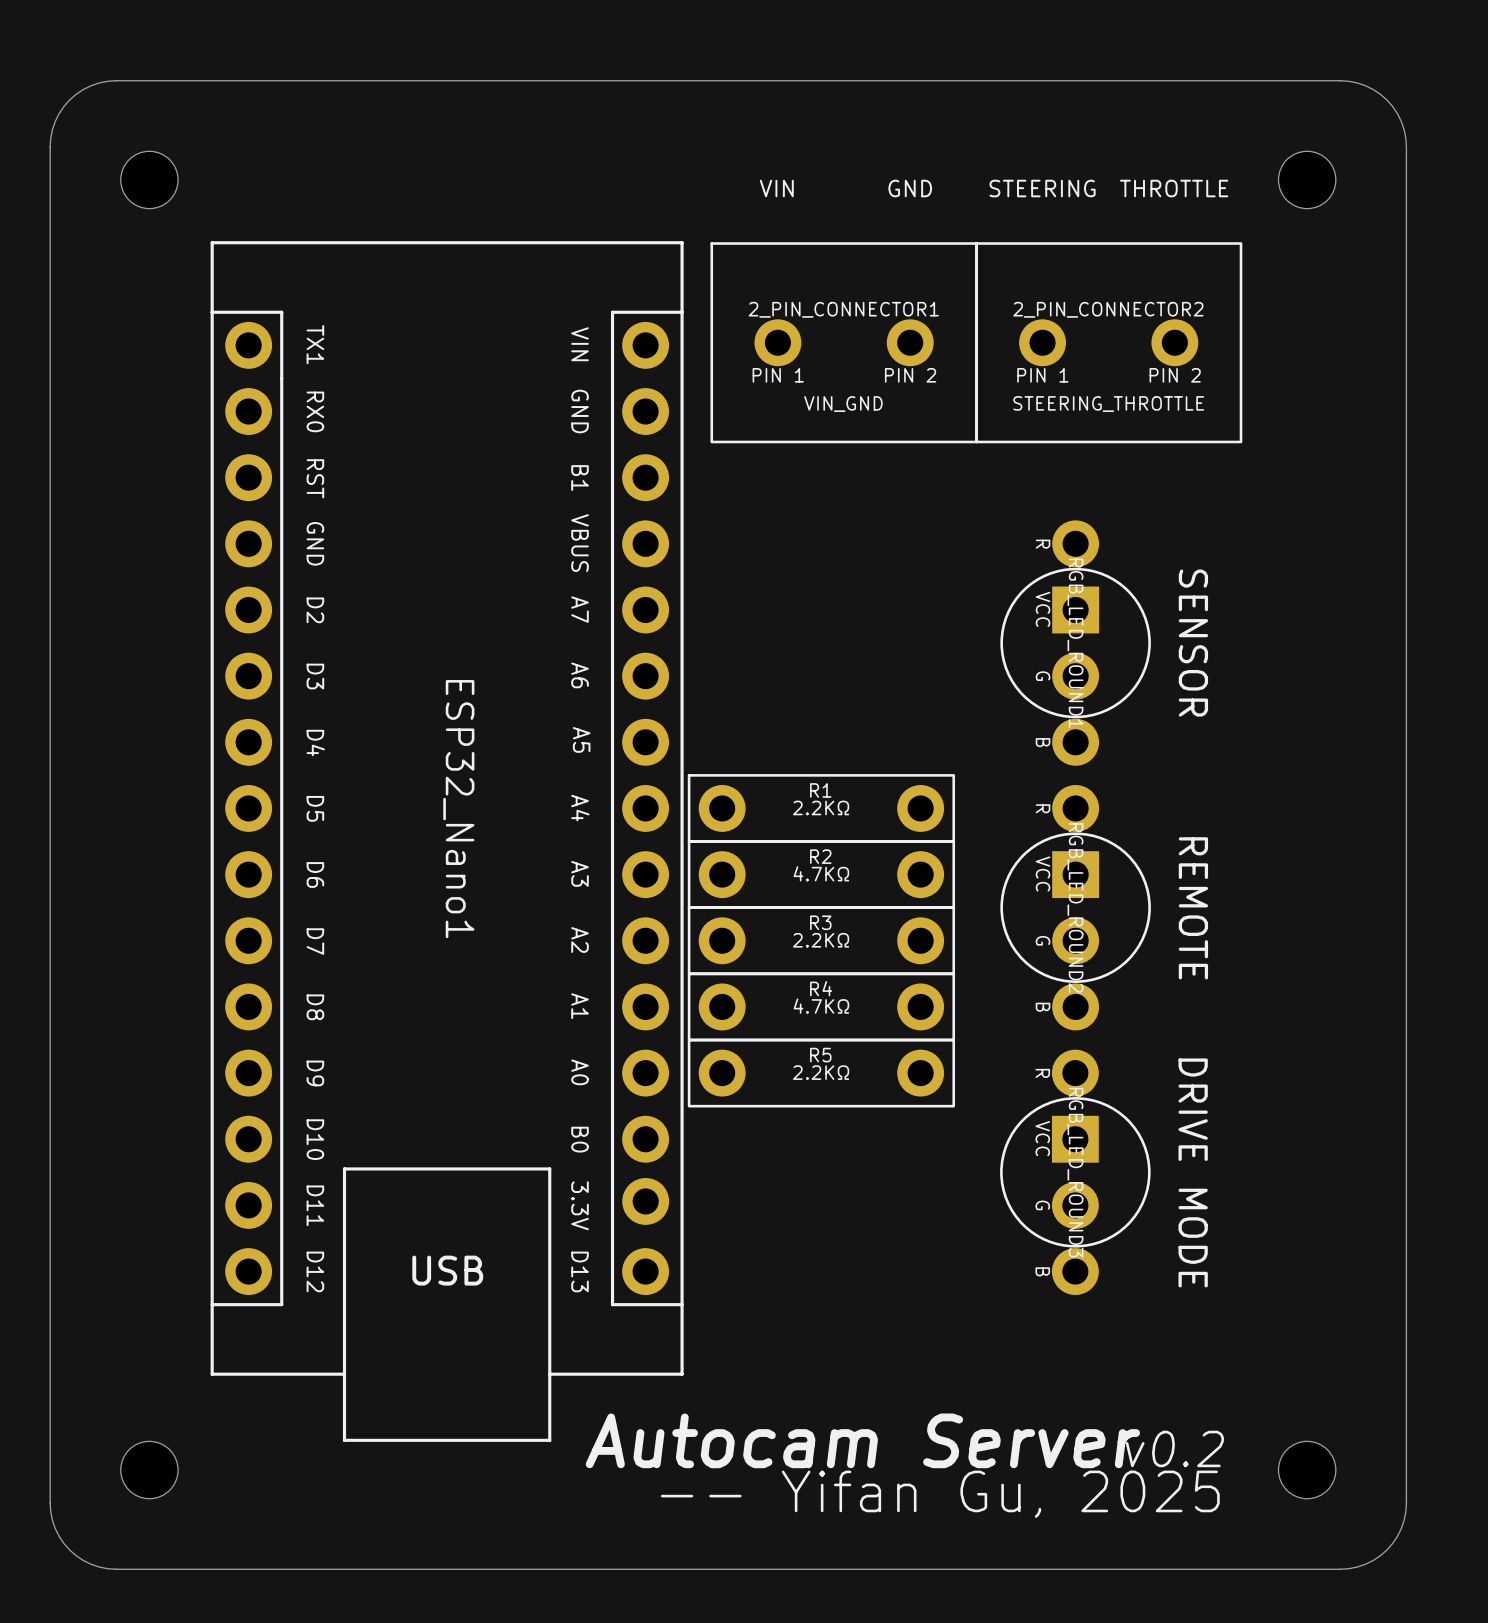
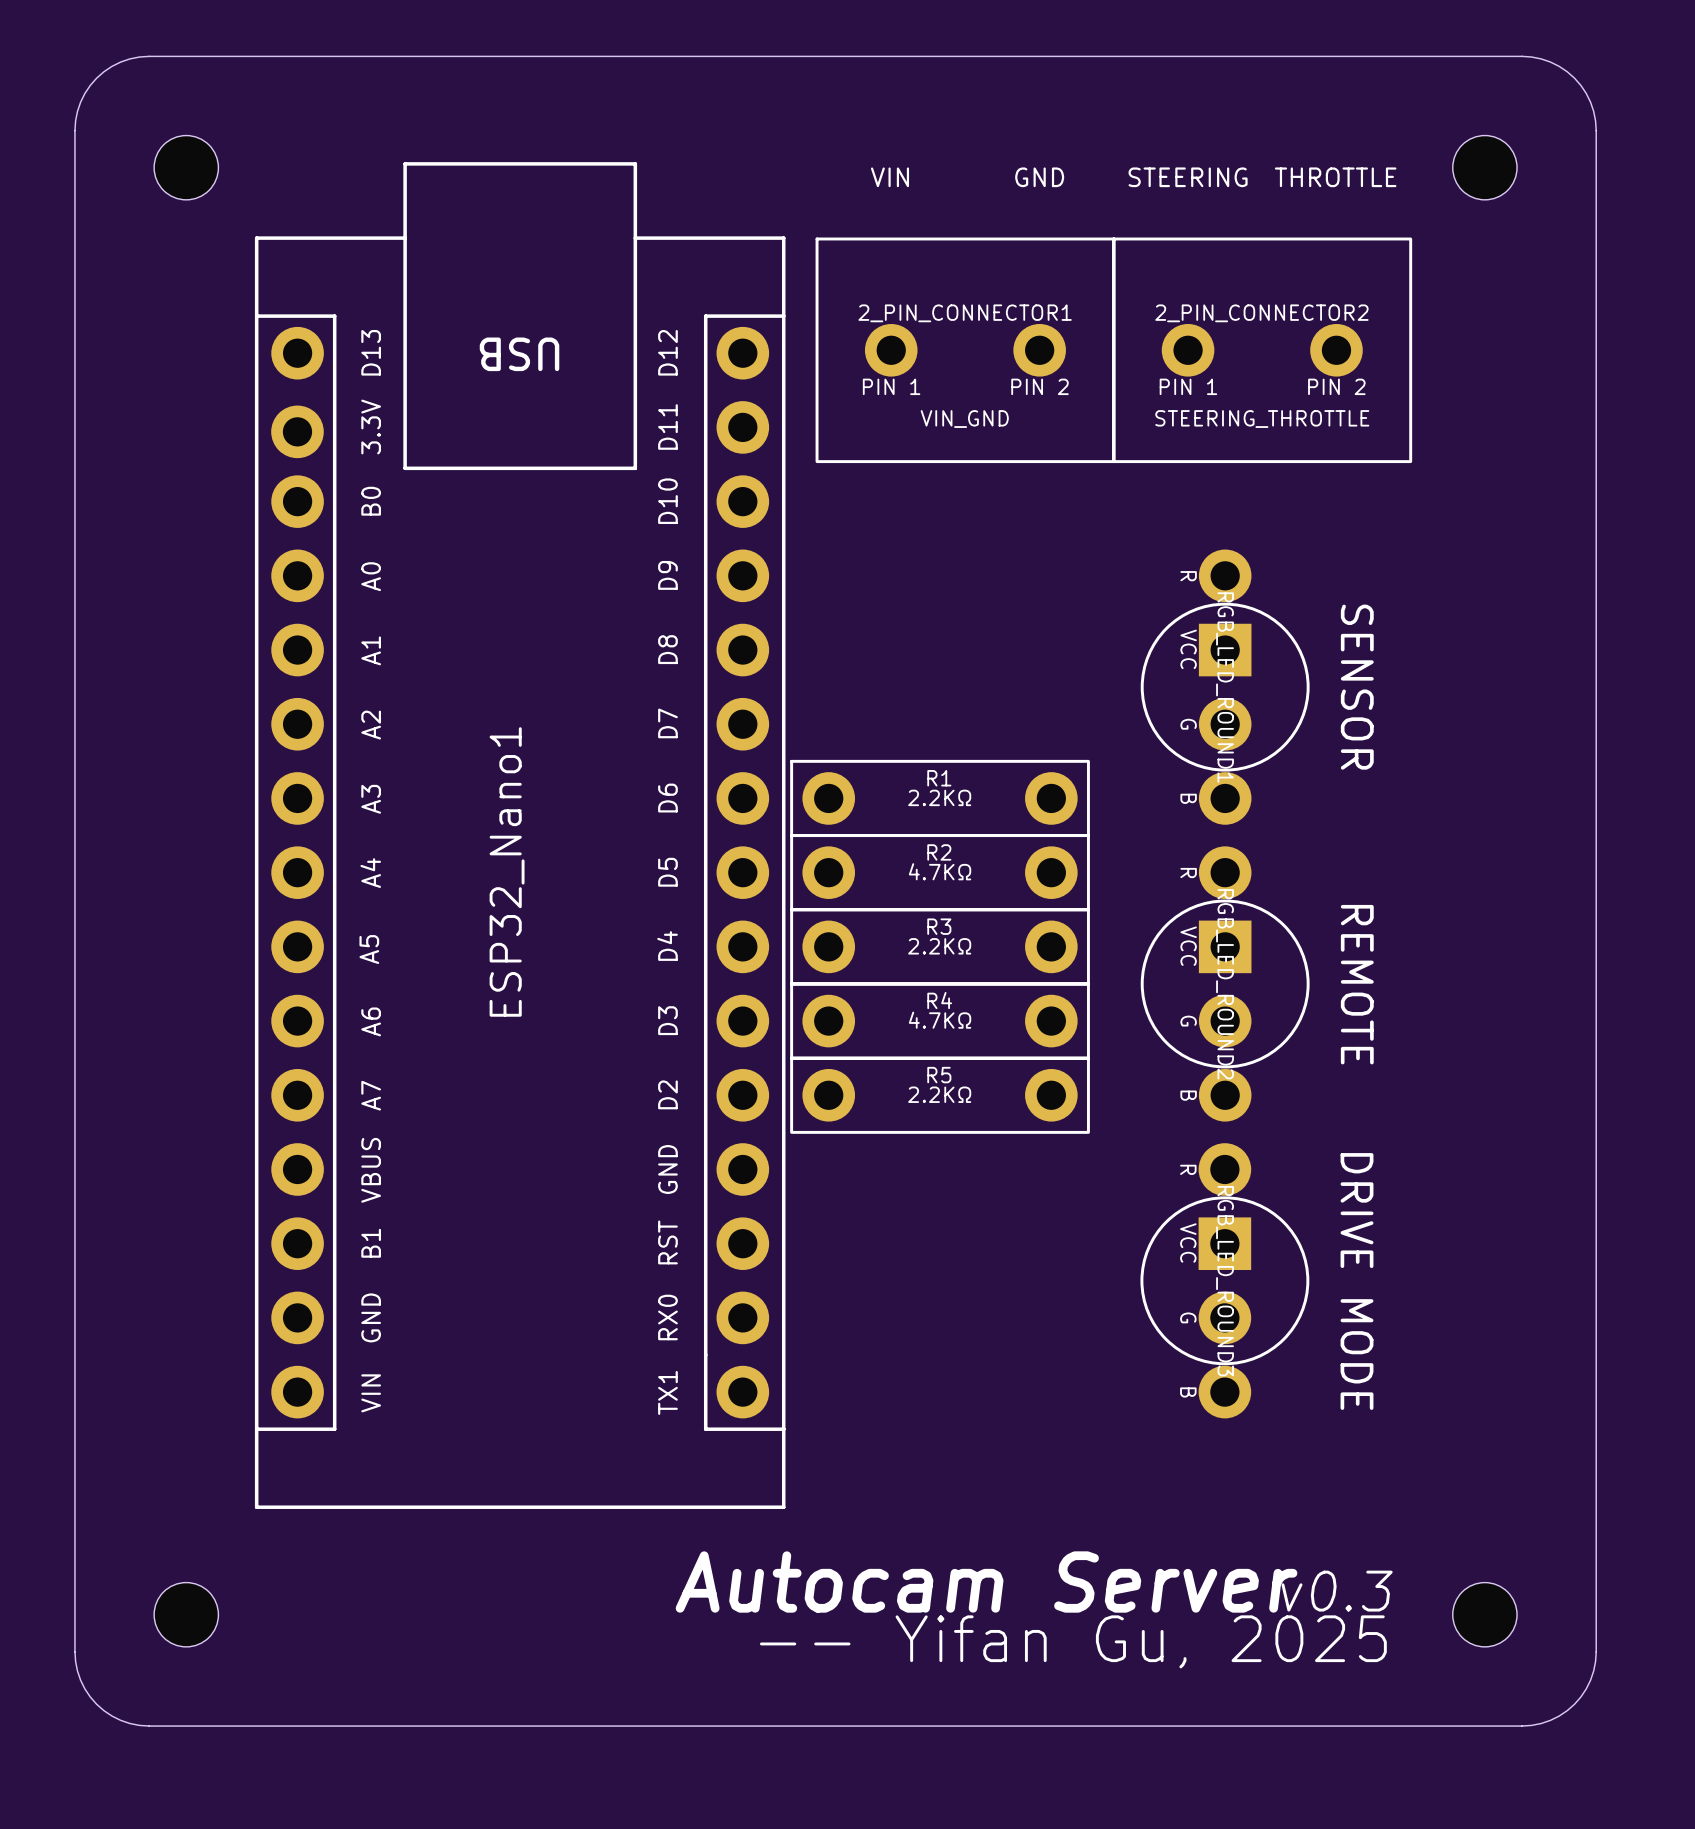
R1: none -> 2.2KΩ (940, 798)
R1 name: R1 (820, 790) -> R2 (939, 852)
R1 value: 2.2KΩ (821, 807) -> 4.7KΩ (940, 871)
ESP32_Nano1 rotation: 0° (447, 841) -> 180° (520, 835)
R2 name: R2 (820, 856) -> R3 (939, 926)
R2 value: 4.7KΩ (821, 873) -> 2.2KΩ (939, 946)
R3 name: R3 (820, 922) -> R4 (939, 1000)
R3 value: 2.2KΩ (821, 940) -> 4.7KΩ (940, 1020)
R4 name: R4 (821, 988) -> R5 (939, 1075)
R4 value: 4.7KΩ (821, 1006) -> 2.2KΩ (939, 1094)
R5: 2.2KΩ (821, 1073) -> none
text: v0.2 (1174, 1448) -> v0.3 (1337, 1591)

